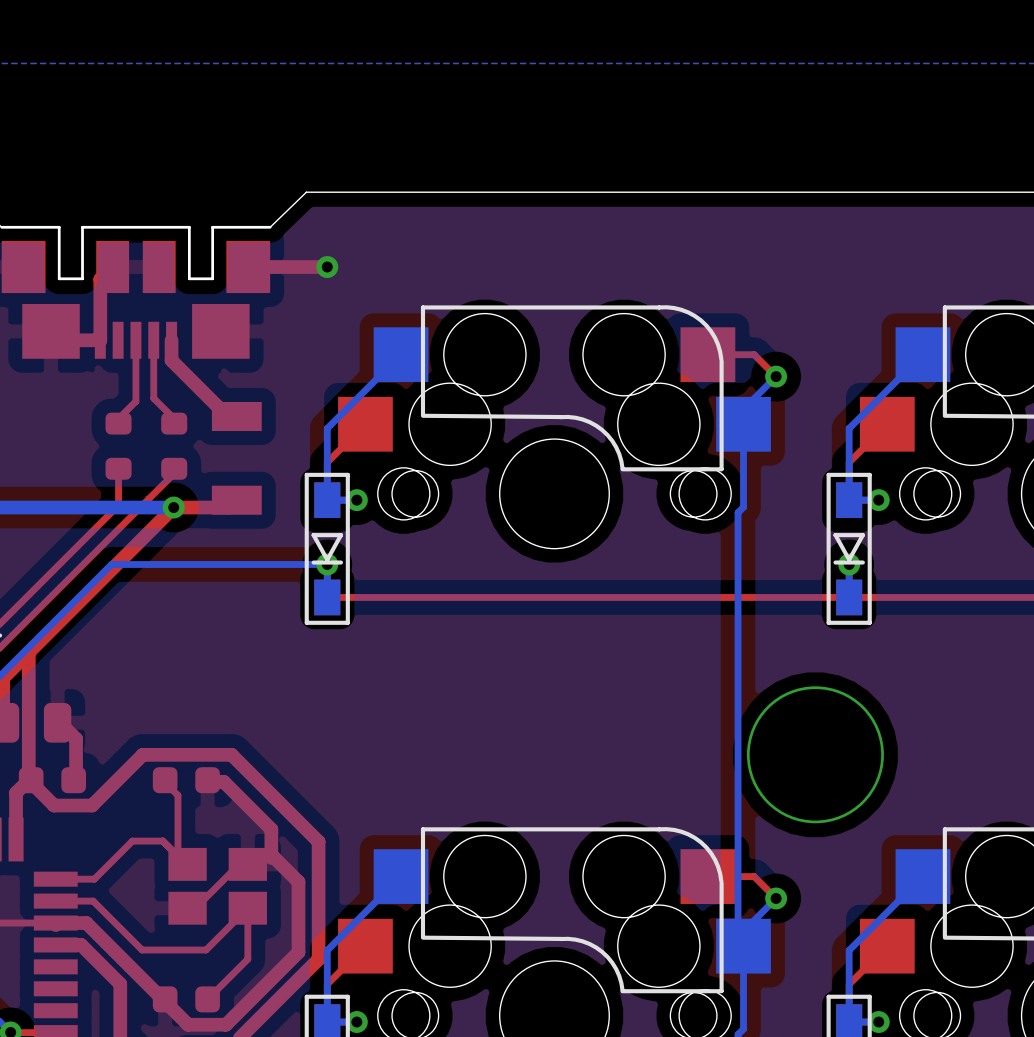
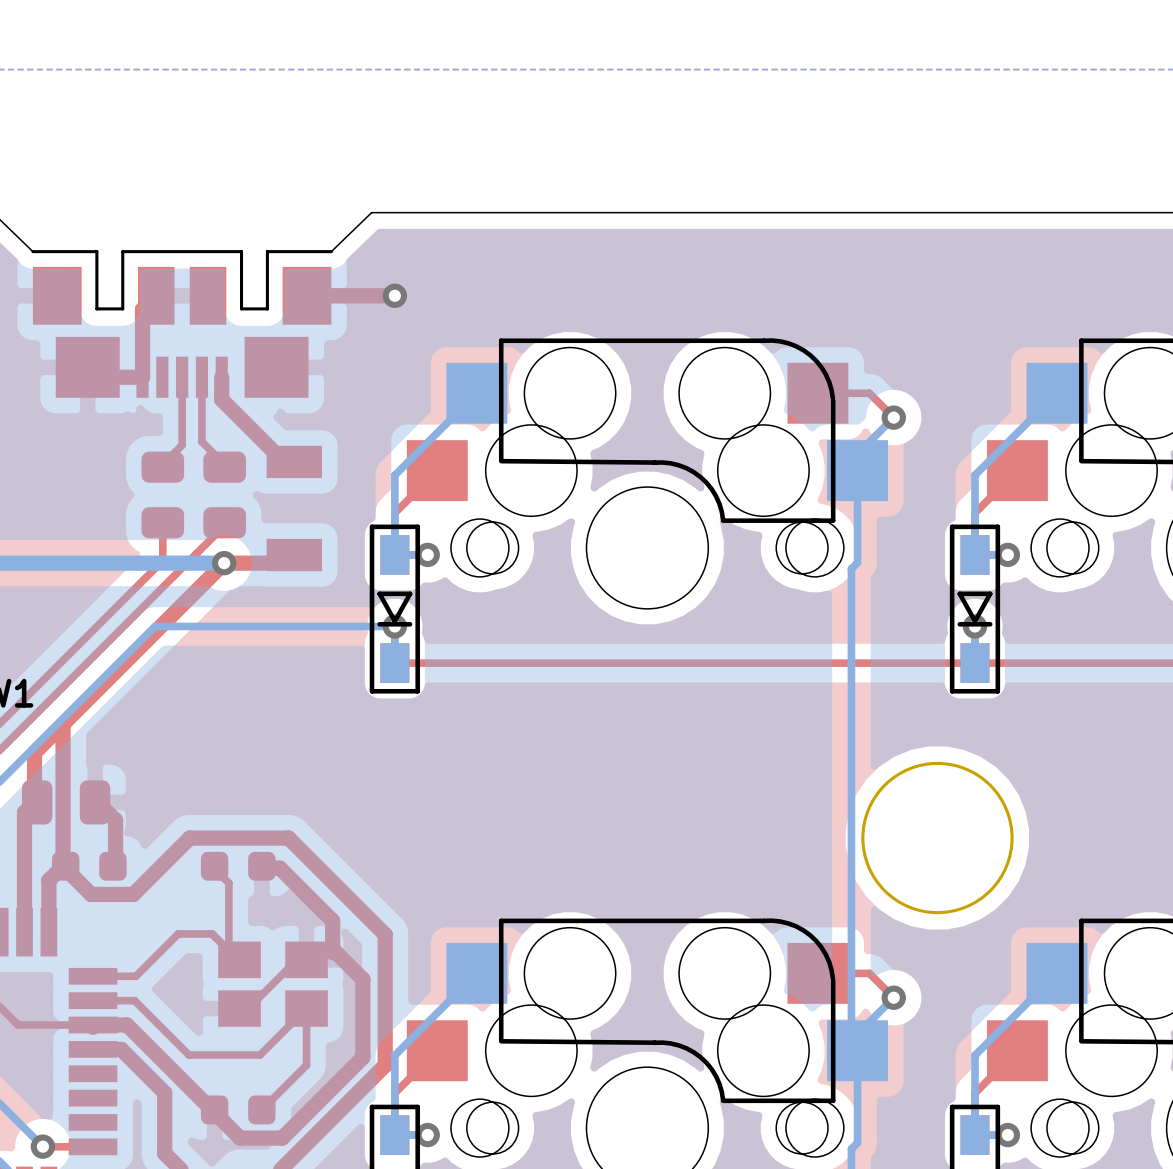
part footprint: [105, 412, 132, 480] -> [141, 451, 185, 539]
part footprint: [161, 412, 188, 480] -> [203, 451, 247, 539]

